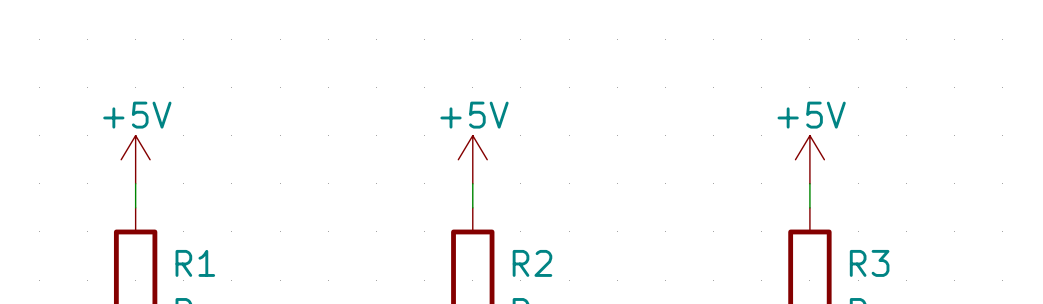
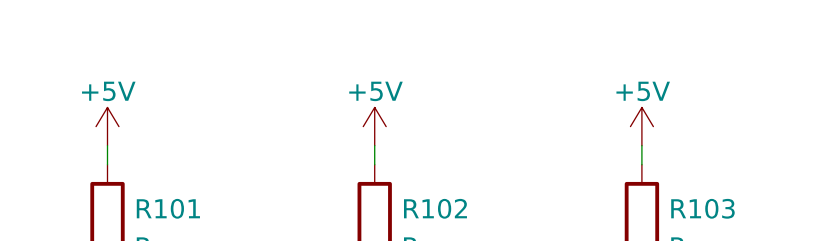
R1 name: R1 (195, 263) -> R101 (168, 208)
R2 name: R2 (532, 263) -> R102 (435, 208)
R3 name: R3 (869, 263) -> R103 (702, 208)

